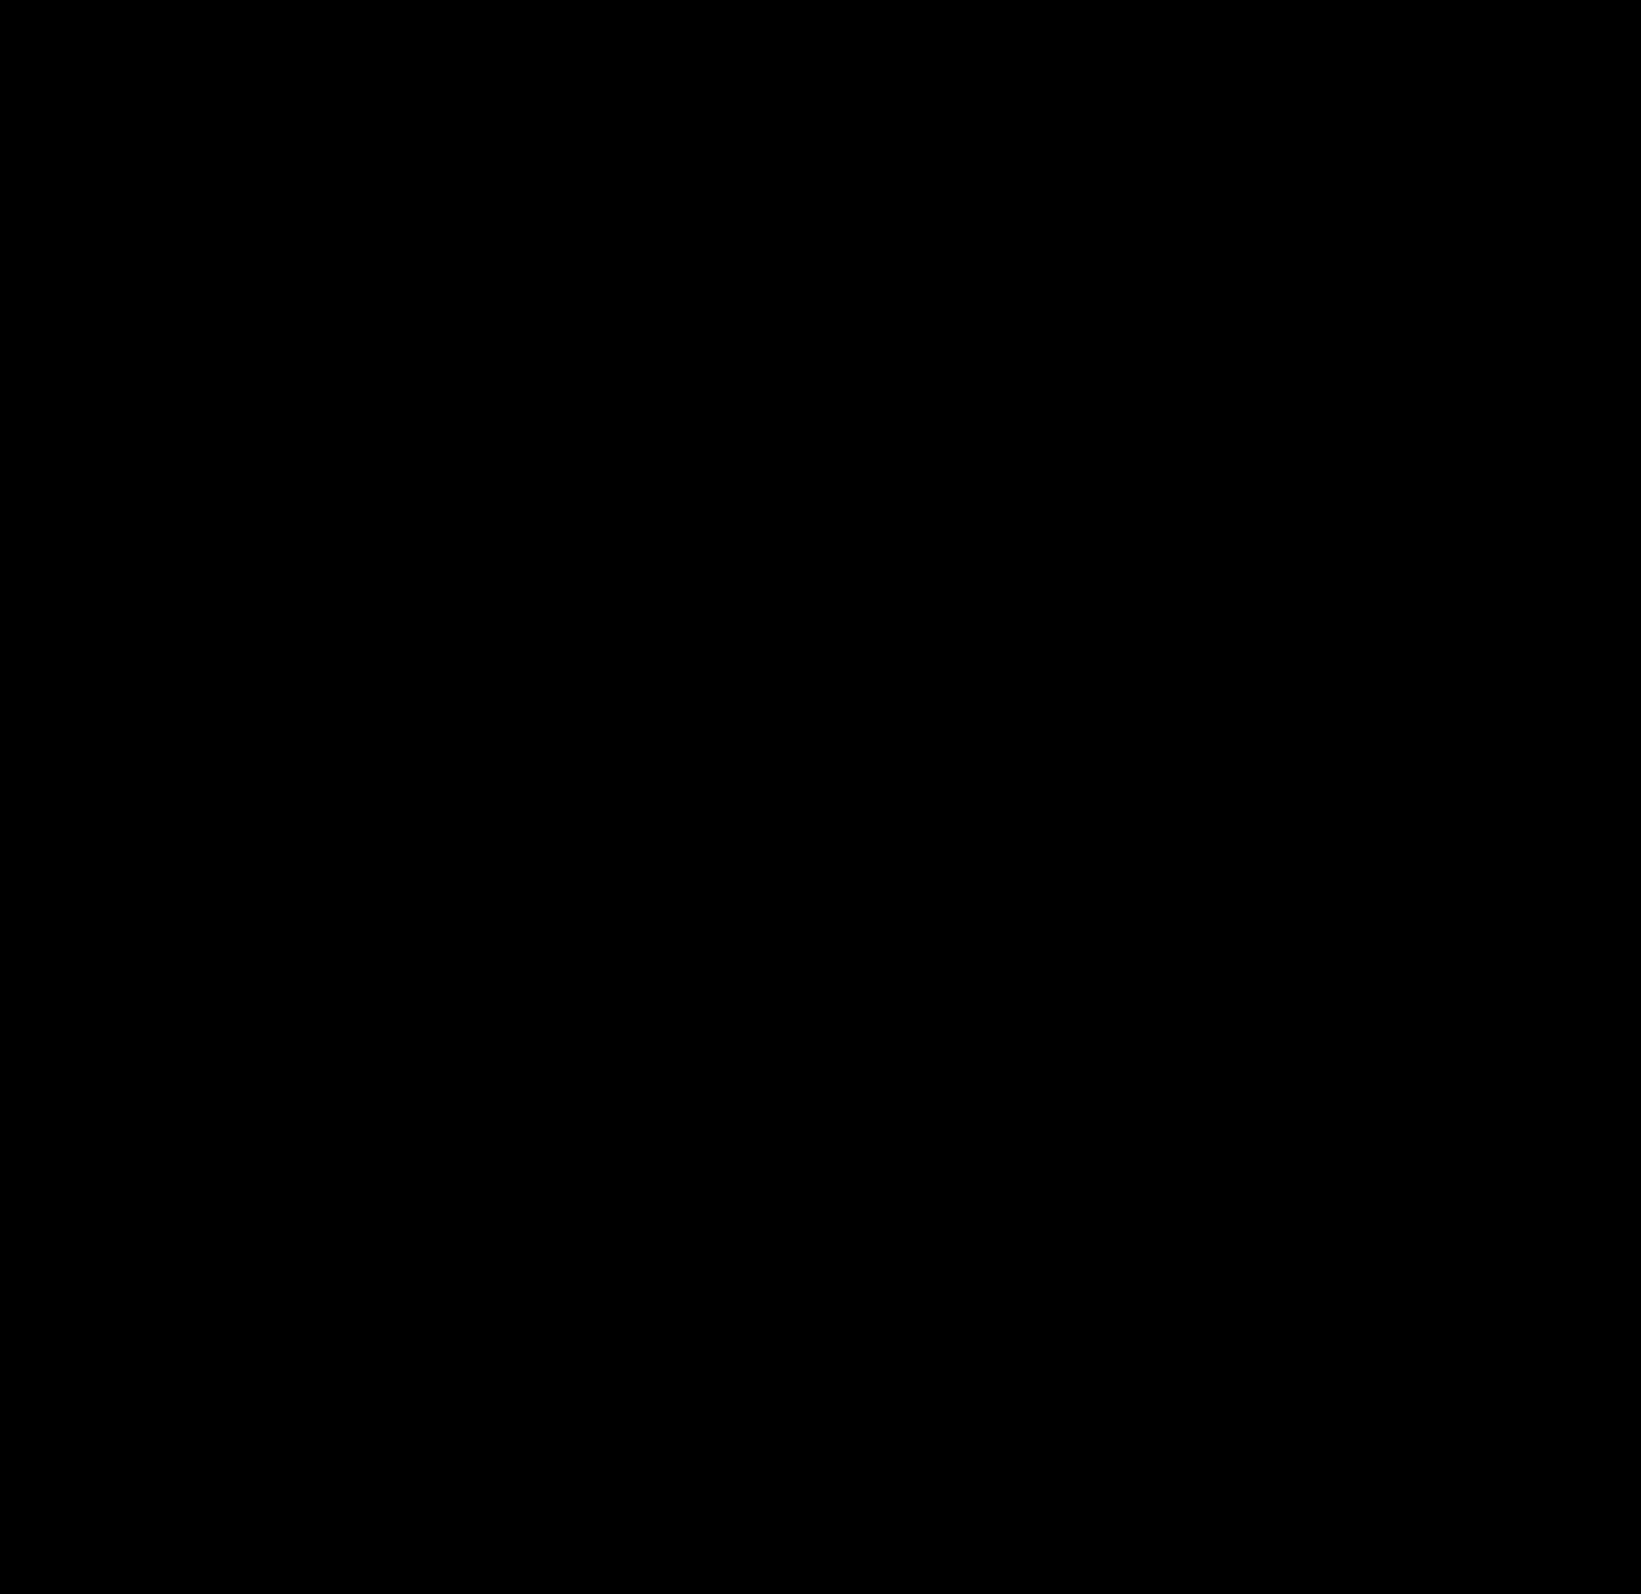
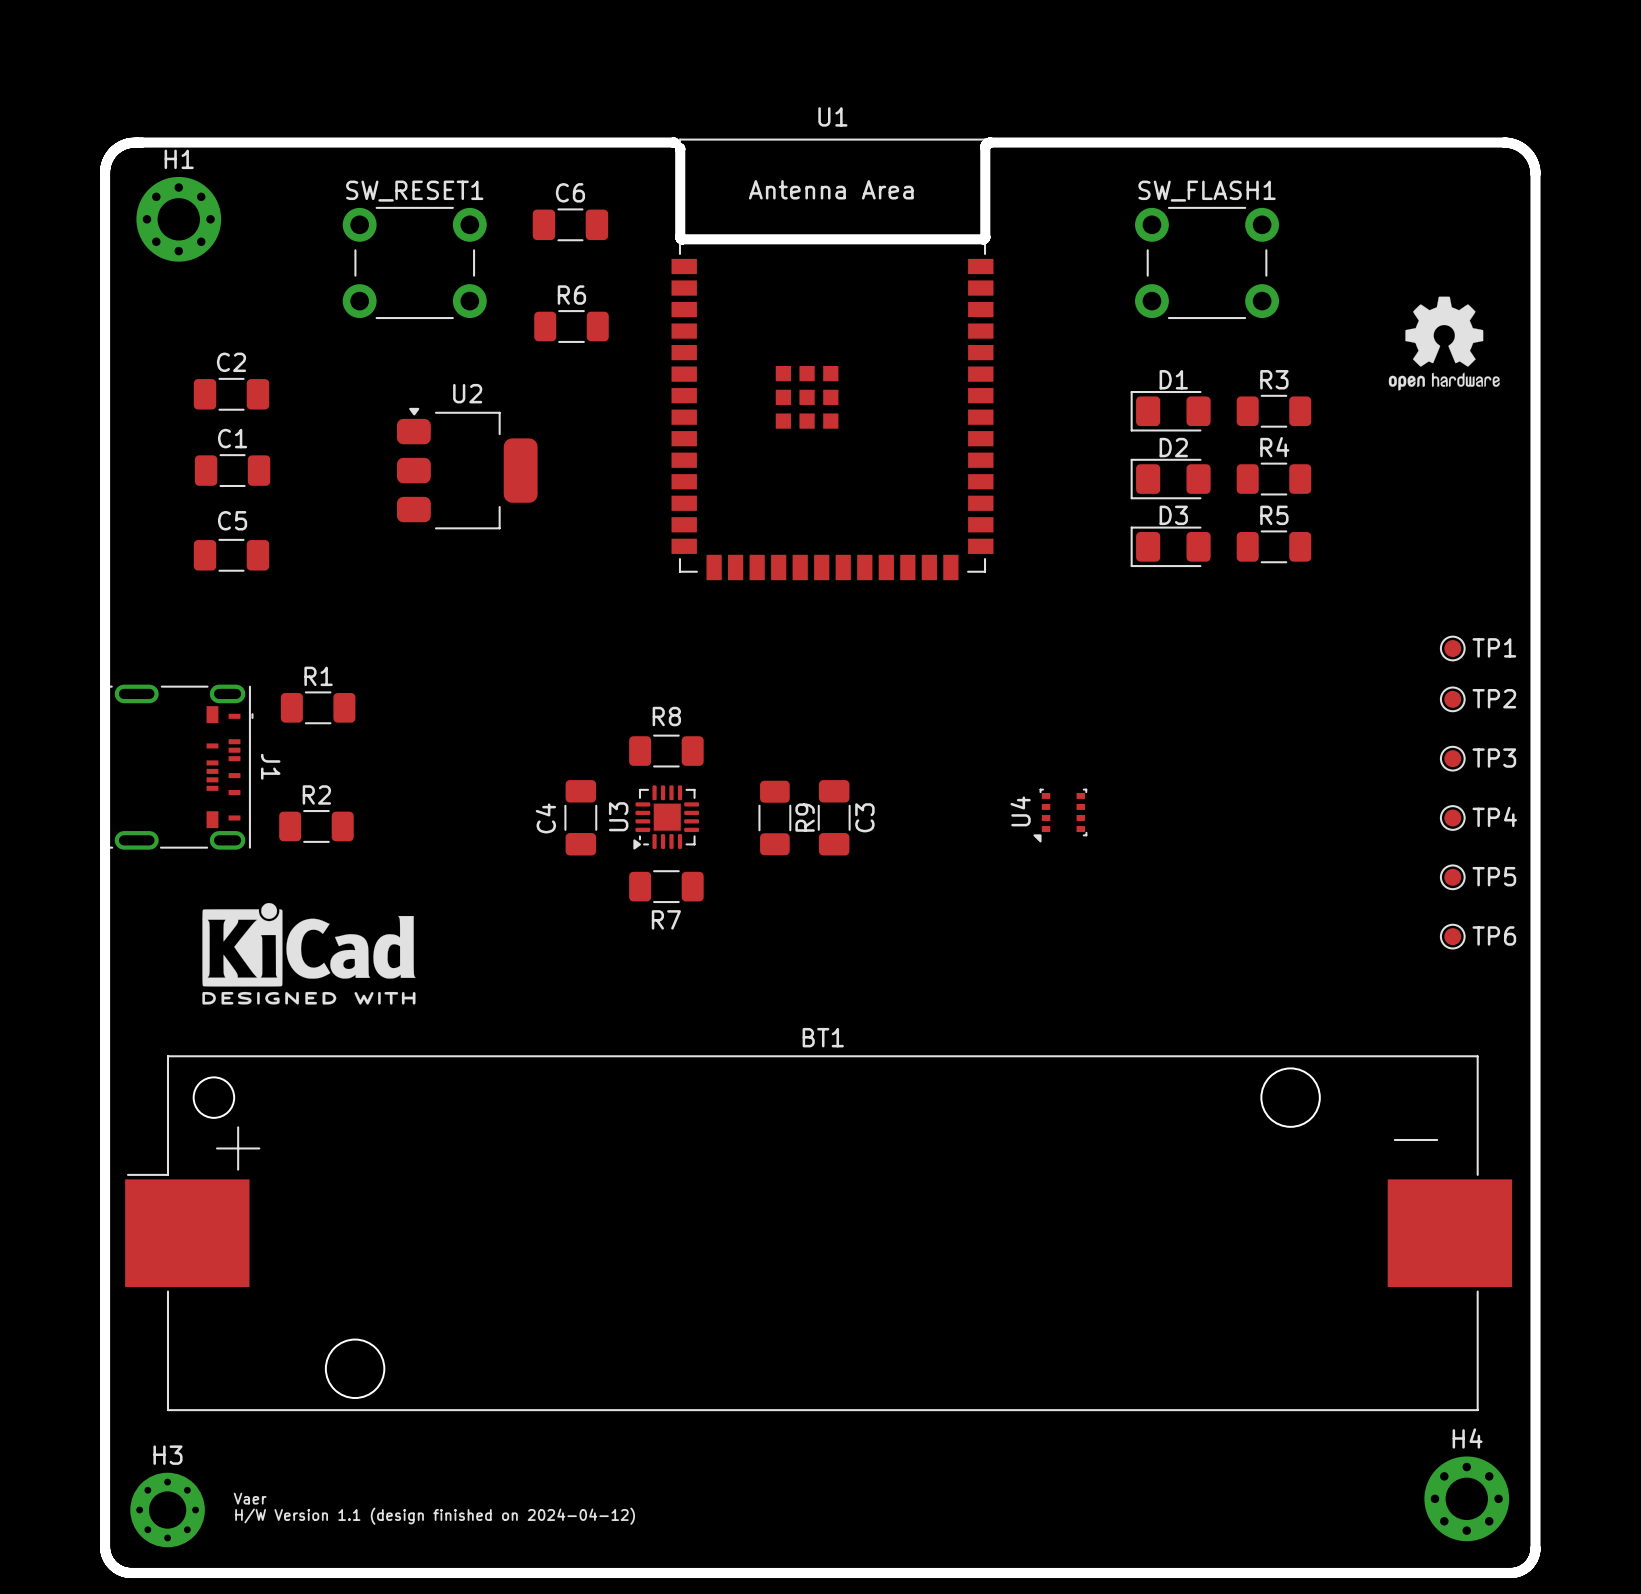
board edge: none -> (990, 142) (1505, 142) (1522, 148) (1533, 163) (1535, 173) (1535, 1548) (1531, 1560) (1522, 1569) (1510, 1572) (131, 1572) (122, 1571) (109, 1561) (105, 1546) (105, 172) (107, 161) (117, 147) (135, 142) (674, 142)
board edge: none -> (985, 147) (985, 236)
board edge: none -> (680, 148) (680, 236)
H1: none -> (178, 219)
C6: none -> (570, 224)
board edge: none -> (682, 239) (982, 239)
SW_RESET1: none -> (414, 262)
SW_FLASH1: none -> (1207, 262)
drawing: none -> [1388, 296, 1500, 391]
R6: none -> (571, 326)
U1: none -> (832, 359)
C2: none -> (231, 394)
D1: none -> (1170, 411)
R3: none -> (1273, 411)
U2: none -> (467, 468)
C1: none -> (232, 470)
D2: none -> (1170, 479)
R4: none -> (1273, 479)
D3: none -> (1170, 546)
R5: none -> (1273, 546)
C5: none -> (231, 555)
TP1: none -> (1452, 648)
TP2: none -> (1452, 699)
R1: none -> (318, 707)
R8: none -> (666, 751)
TP3: none -> (1452, 758)
J1: none -> (180, 767)
U4: none -> (1060, 815)
C4: none -> (580, 817)
U3: none -> (666, 817)
R9: none -> (774, 817)
C3: none -> (834, 817)
TP4: none -> (1452, 817)
R2: none -> (316, 826)
TP5: none -> (1452, 877)
R7: none -> (666, 886)
drawing: none -> [202, 903, 416, 1005]
TP6: none -> (1452, 936)
BT1: none -> (818, 1233)
text: none -> Vaer (250, 1498)
H4: none -> (1466, 1498)
H3: none -> (167, 1510)
text: none -> H/W Version 1.1 (design finished on 2024-04-12) (435, 1516)

